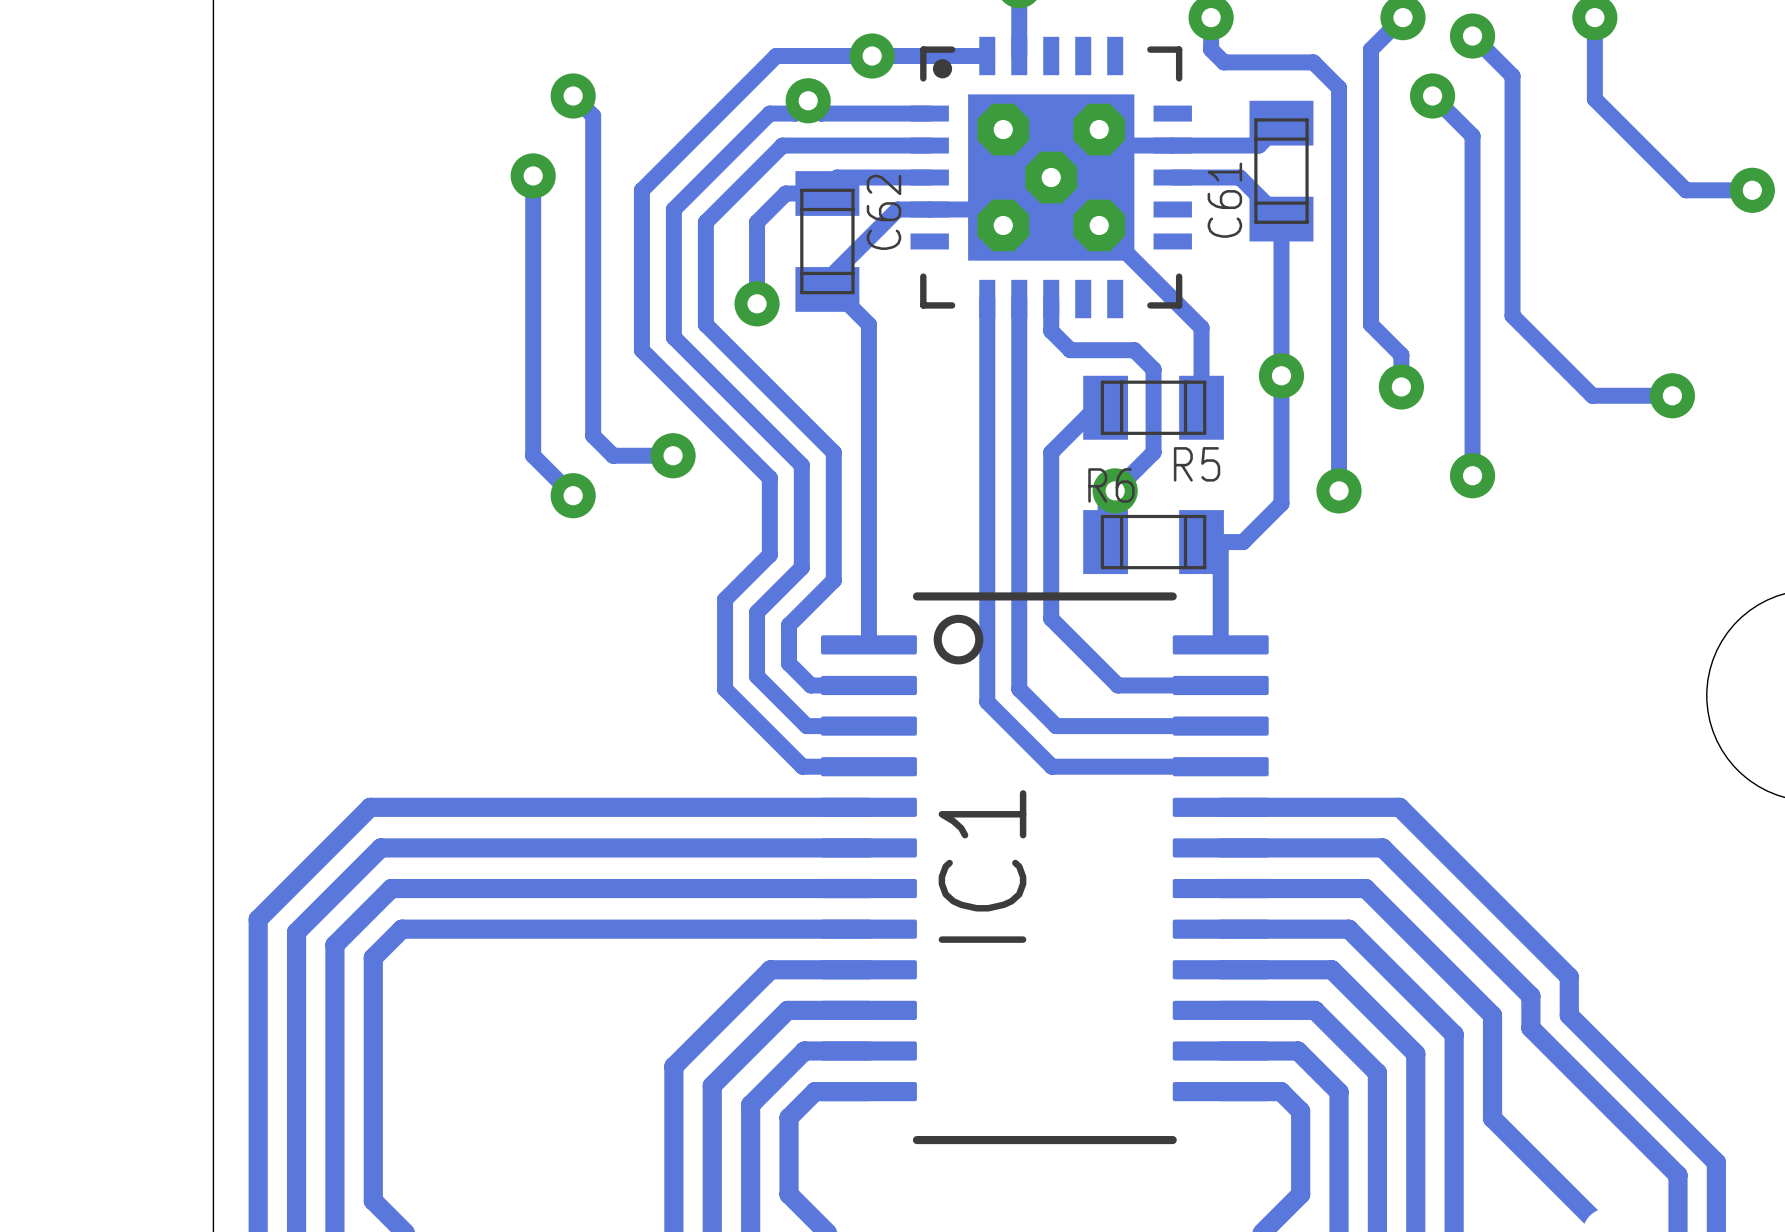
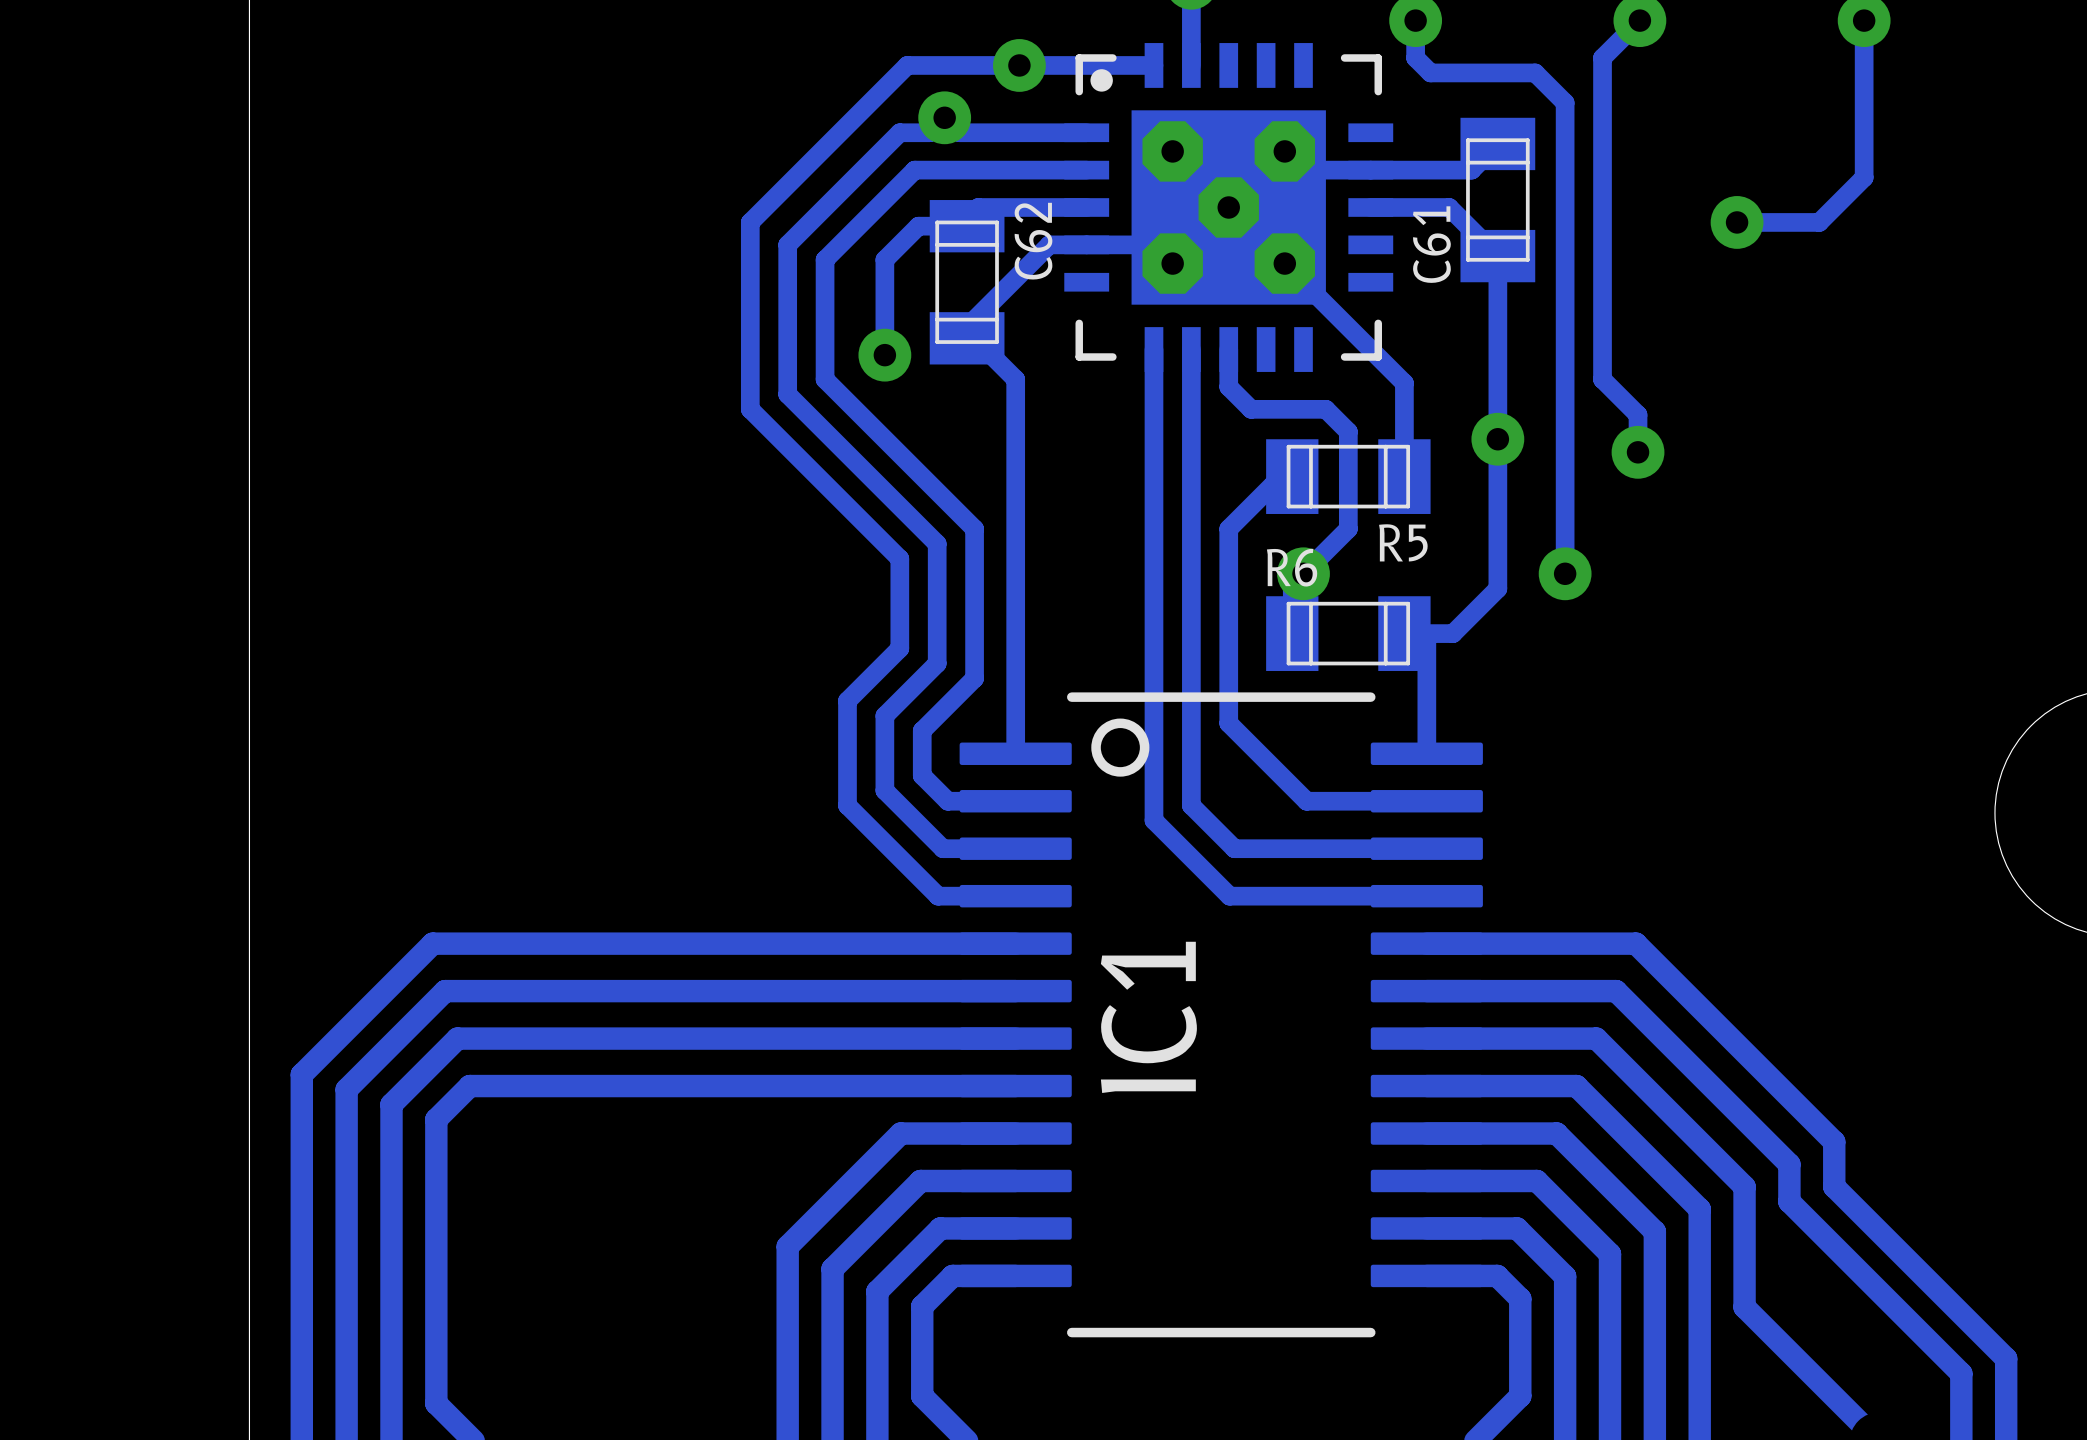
track: (1472, 36) (1512, 75) (1512, 315) (1592, 395) (1672, 395) -> none
via: (1472, 36) -> none
track: (573, 95) (593, 115) (593, 435) (613, 455) (673, 455) -> none
via: (573, 95) -> none
track: (1432, 95) (1472, 135) (1472, 475) -> none
via: (1432, 95) -> none
track: (1594, 99) (1685, 190) (1752, 190) -> (1864, 115) (1864, 177) (1819, 222) (1737, 222)
track: (533, 175) (533, 455) (573, 495) -> none
via: (533, 175) -> none
via: none -> (1737, 222)
via: (1752, 190) -> none
via: (1672, 395) -> none
via: (673, 455) -> none
via: (1472, 475) -> none
via: (573, 495) -> none

